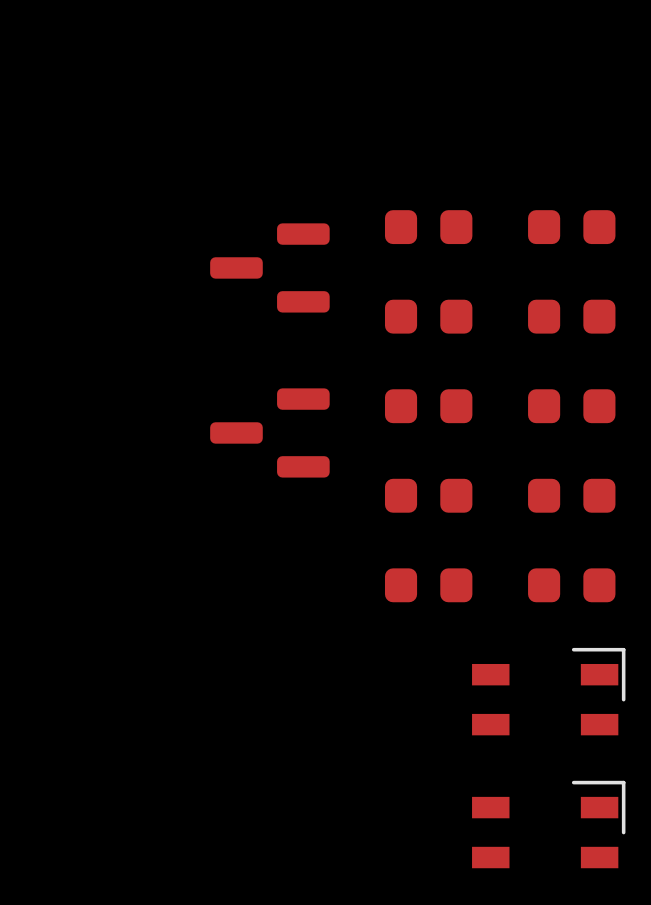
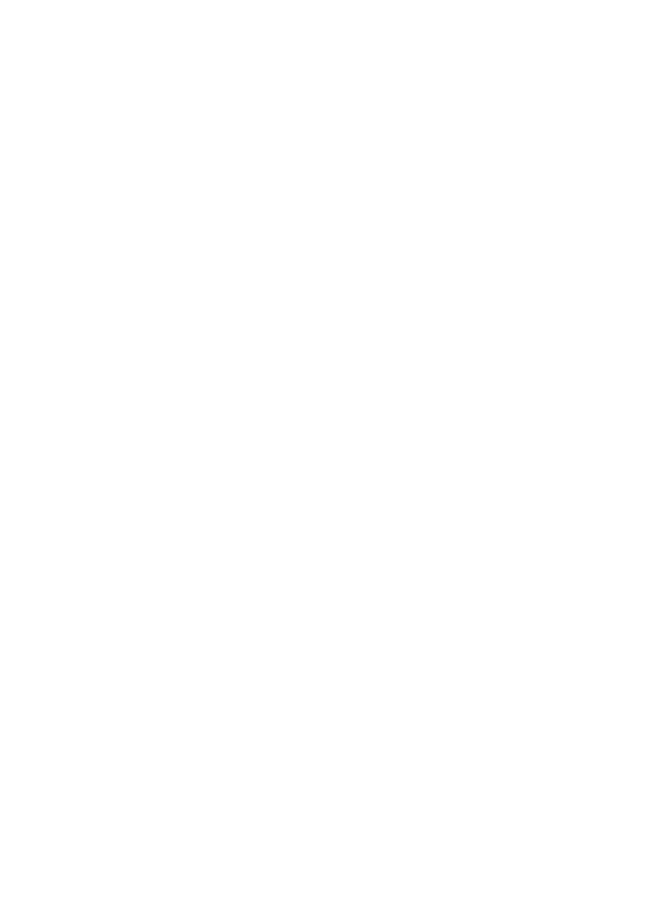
part: (428, 227) -> none
part: (571, 227) -> none
part: (269, 267) -> none
part: (428, 316) -> none
part: (571, 316) -> none
part: (428, 406) -> none
part: (571, 406) -> none
part: (269, 432) -> none
part: (428, 495) -> none
part: (571, 495) -> none
part: (428, 585) -> none
part: (571, 585) -> none
part: (548, 691) -> none
part: (548, 824) -> none

